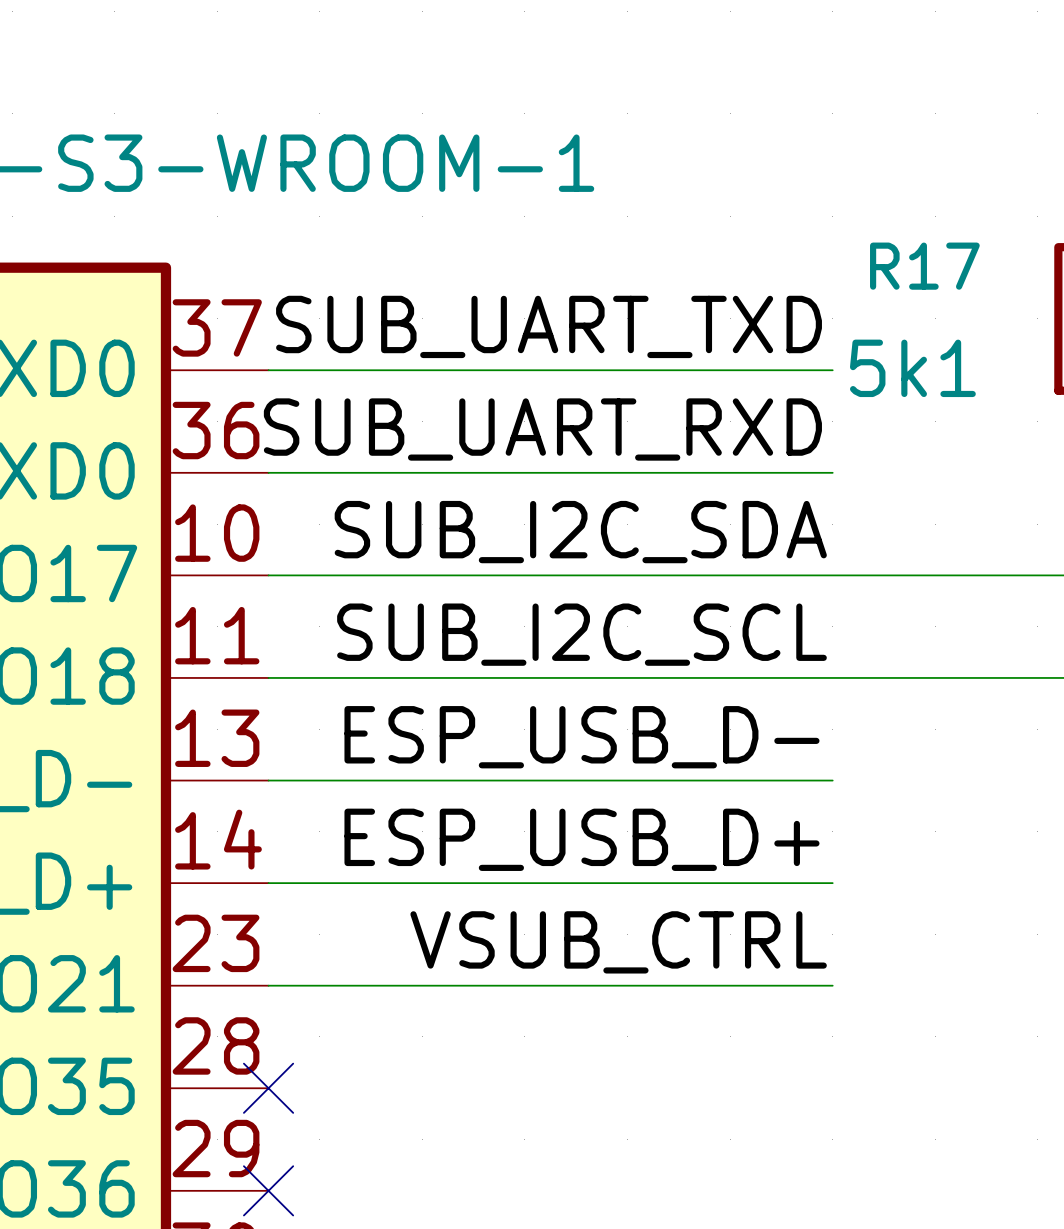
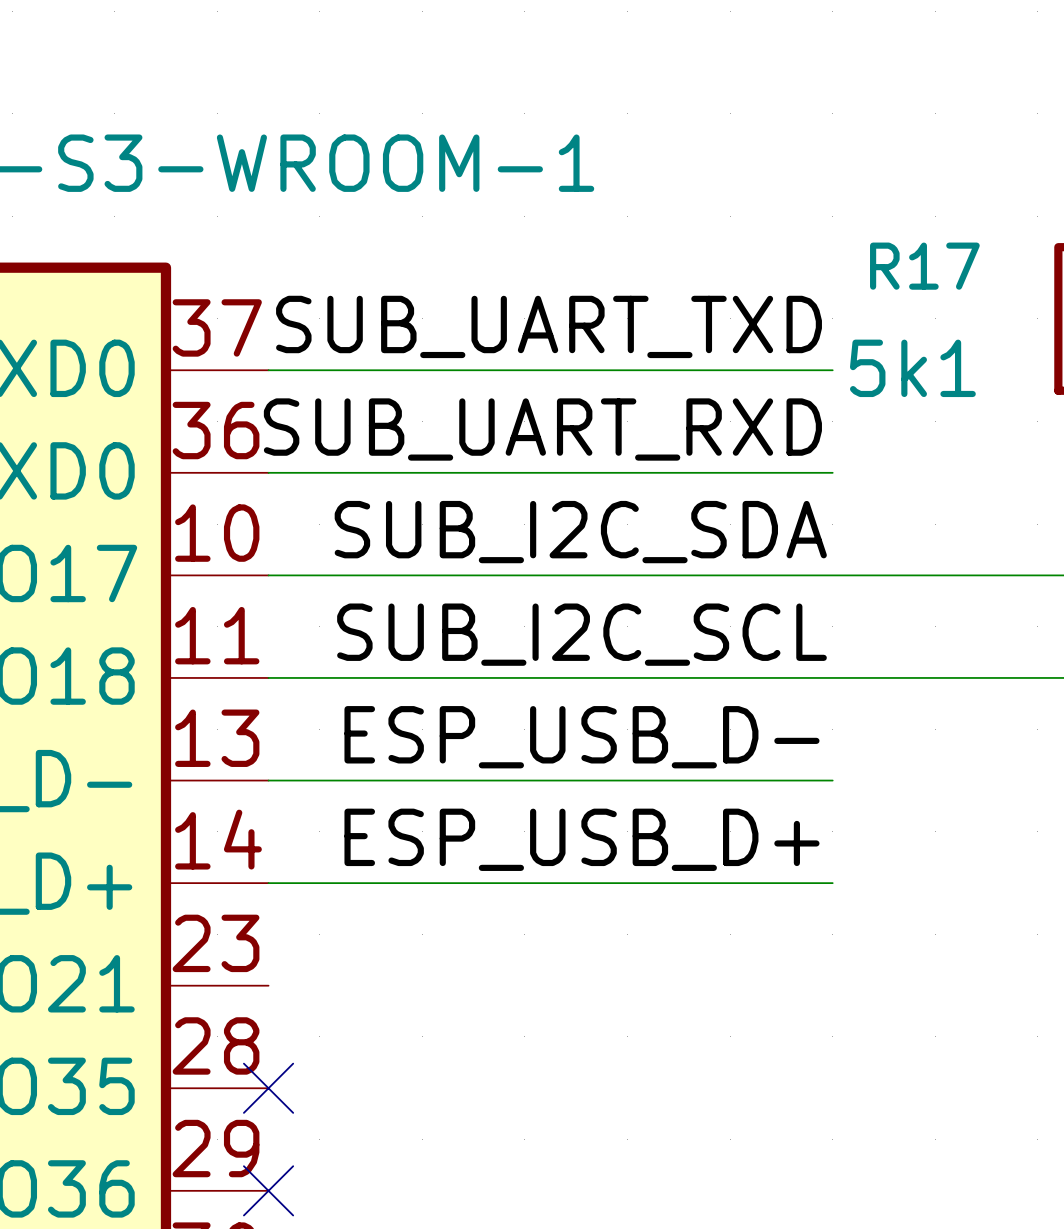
label: VSUB_CTRL (618, 942) -> none
wire: (268, 985) (832, 985) -> none

